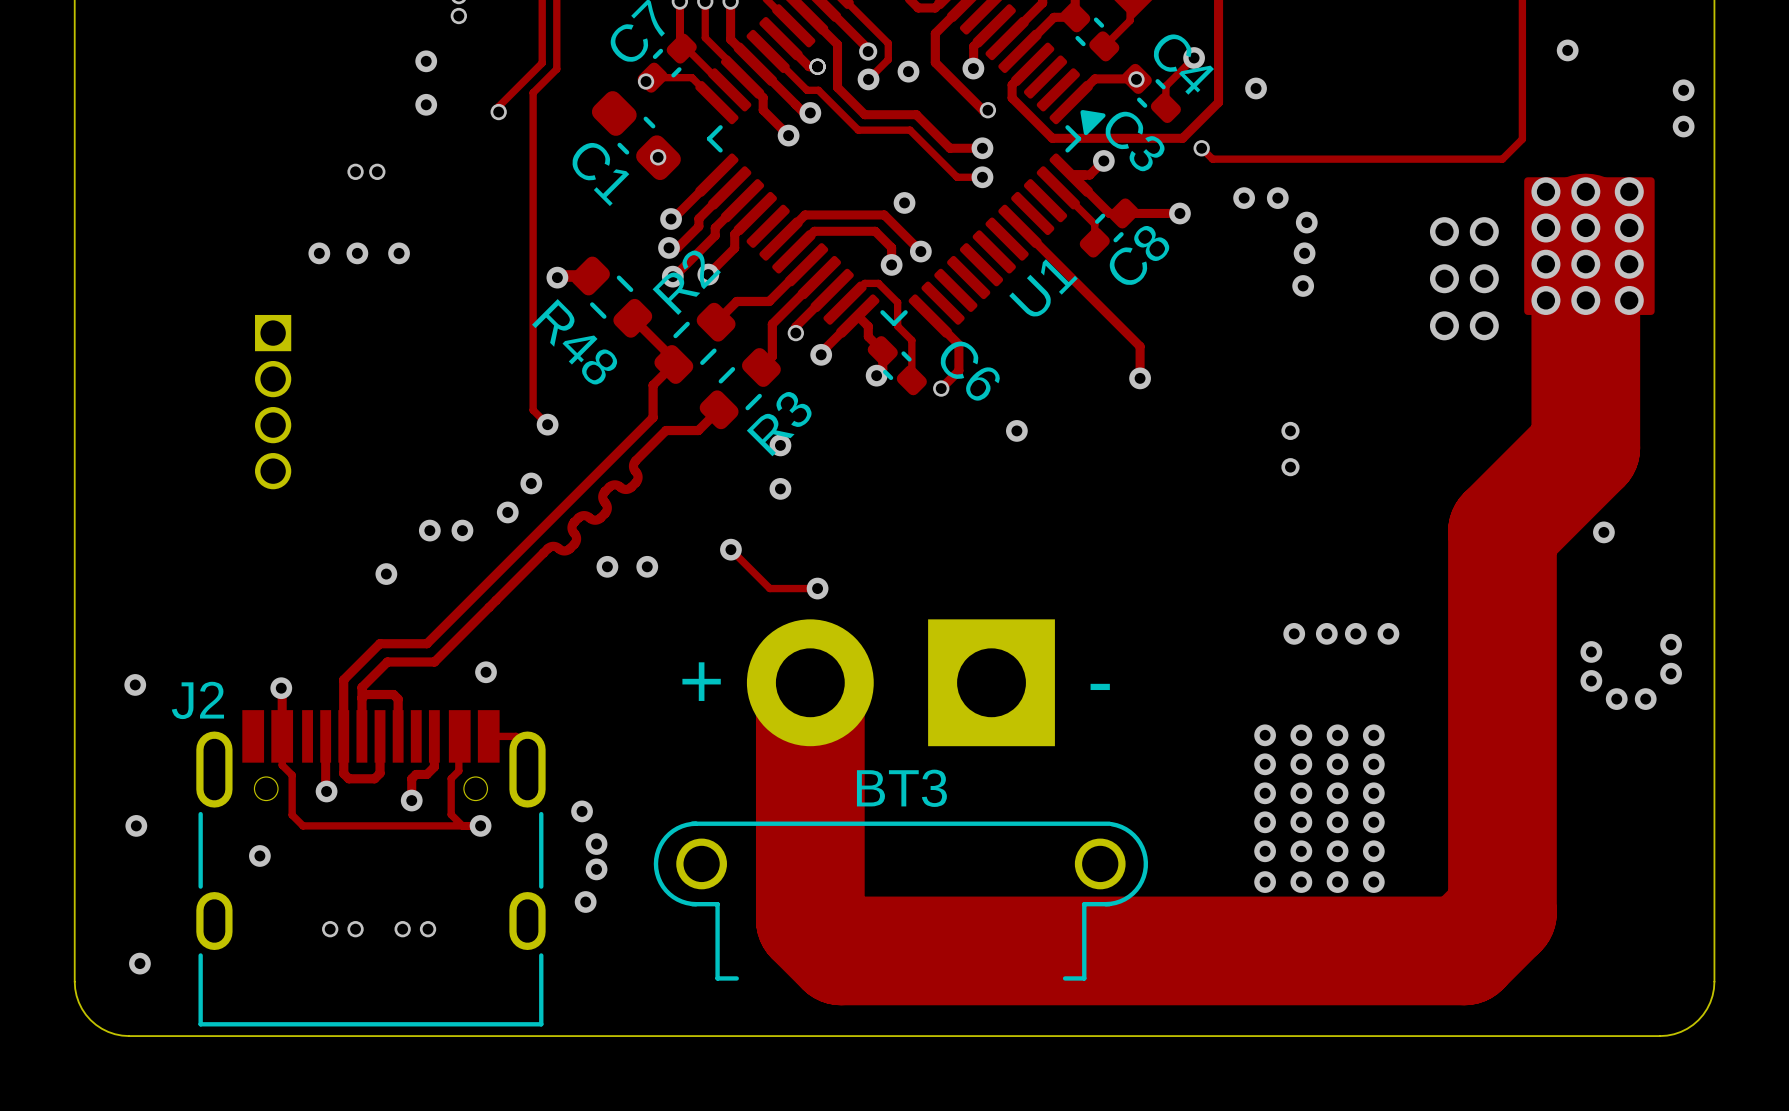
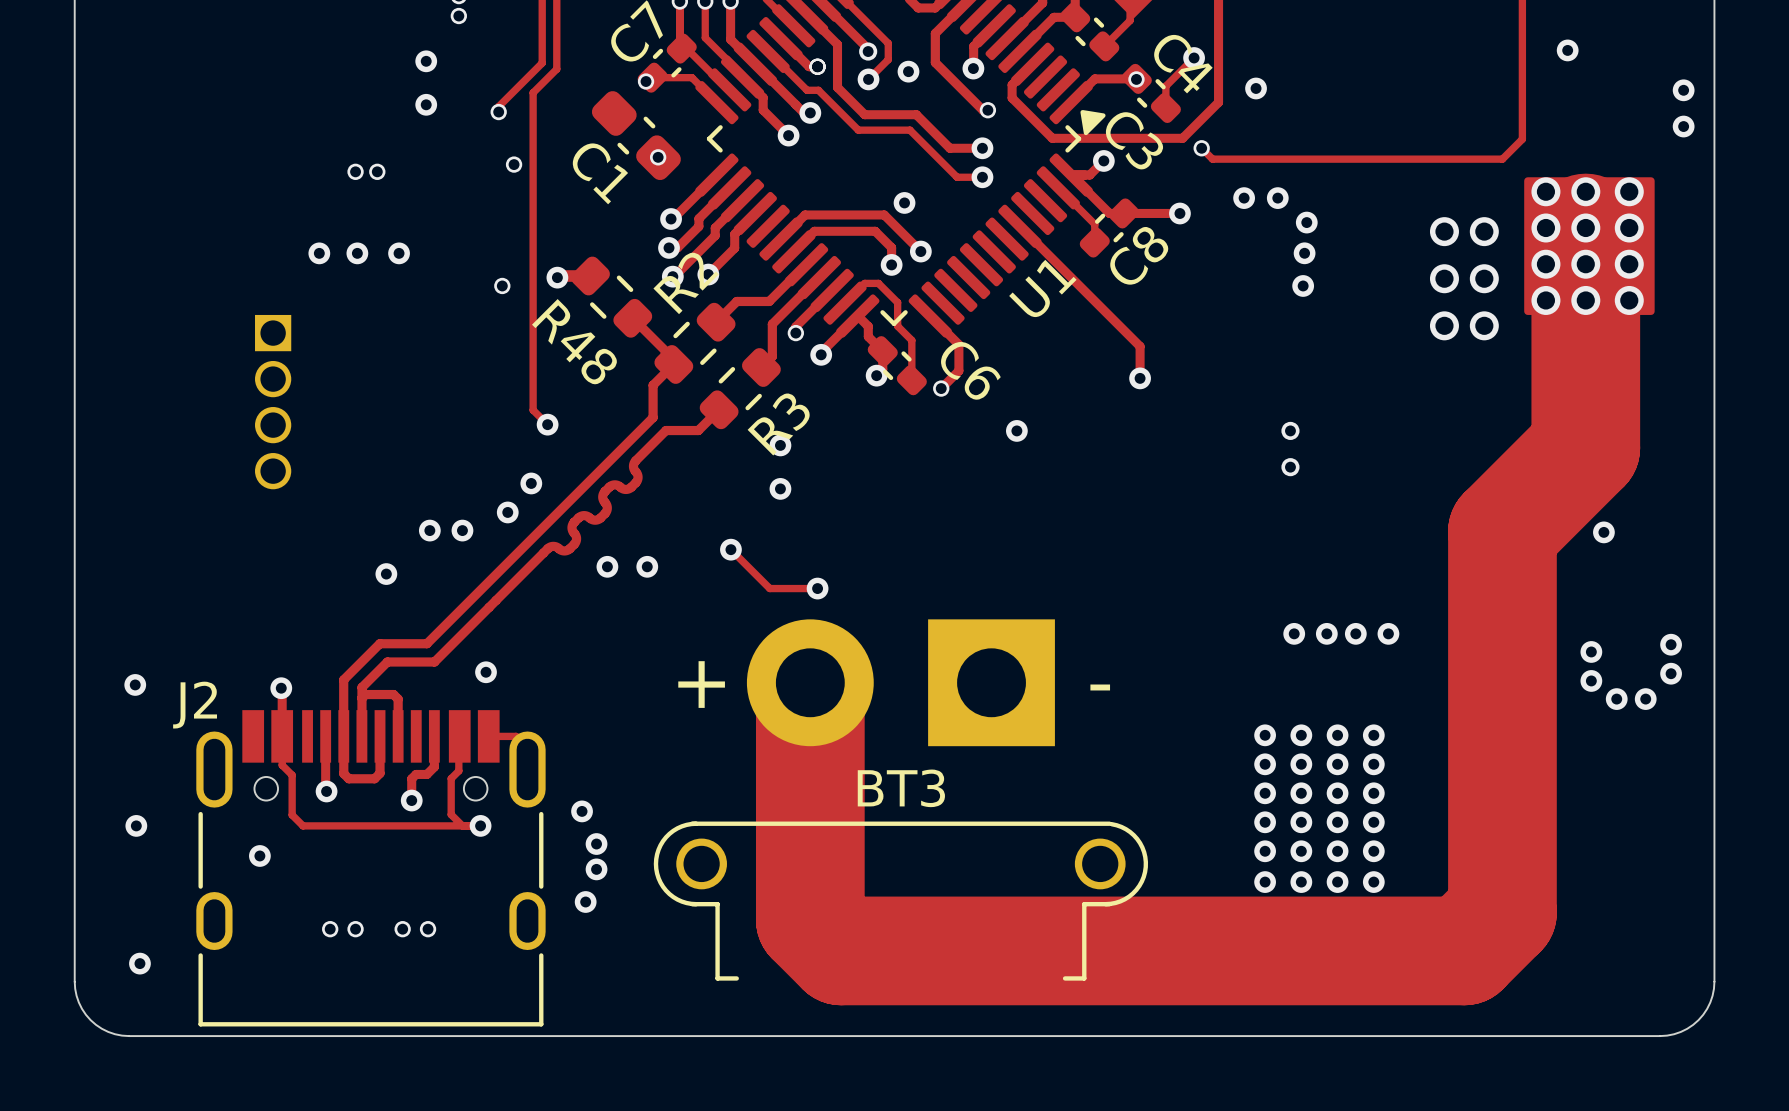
via: none -> (514, 164)
via: none -> (502, 285)

